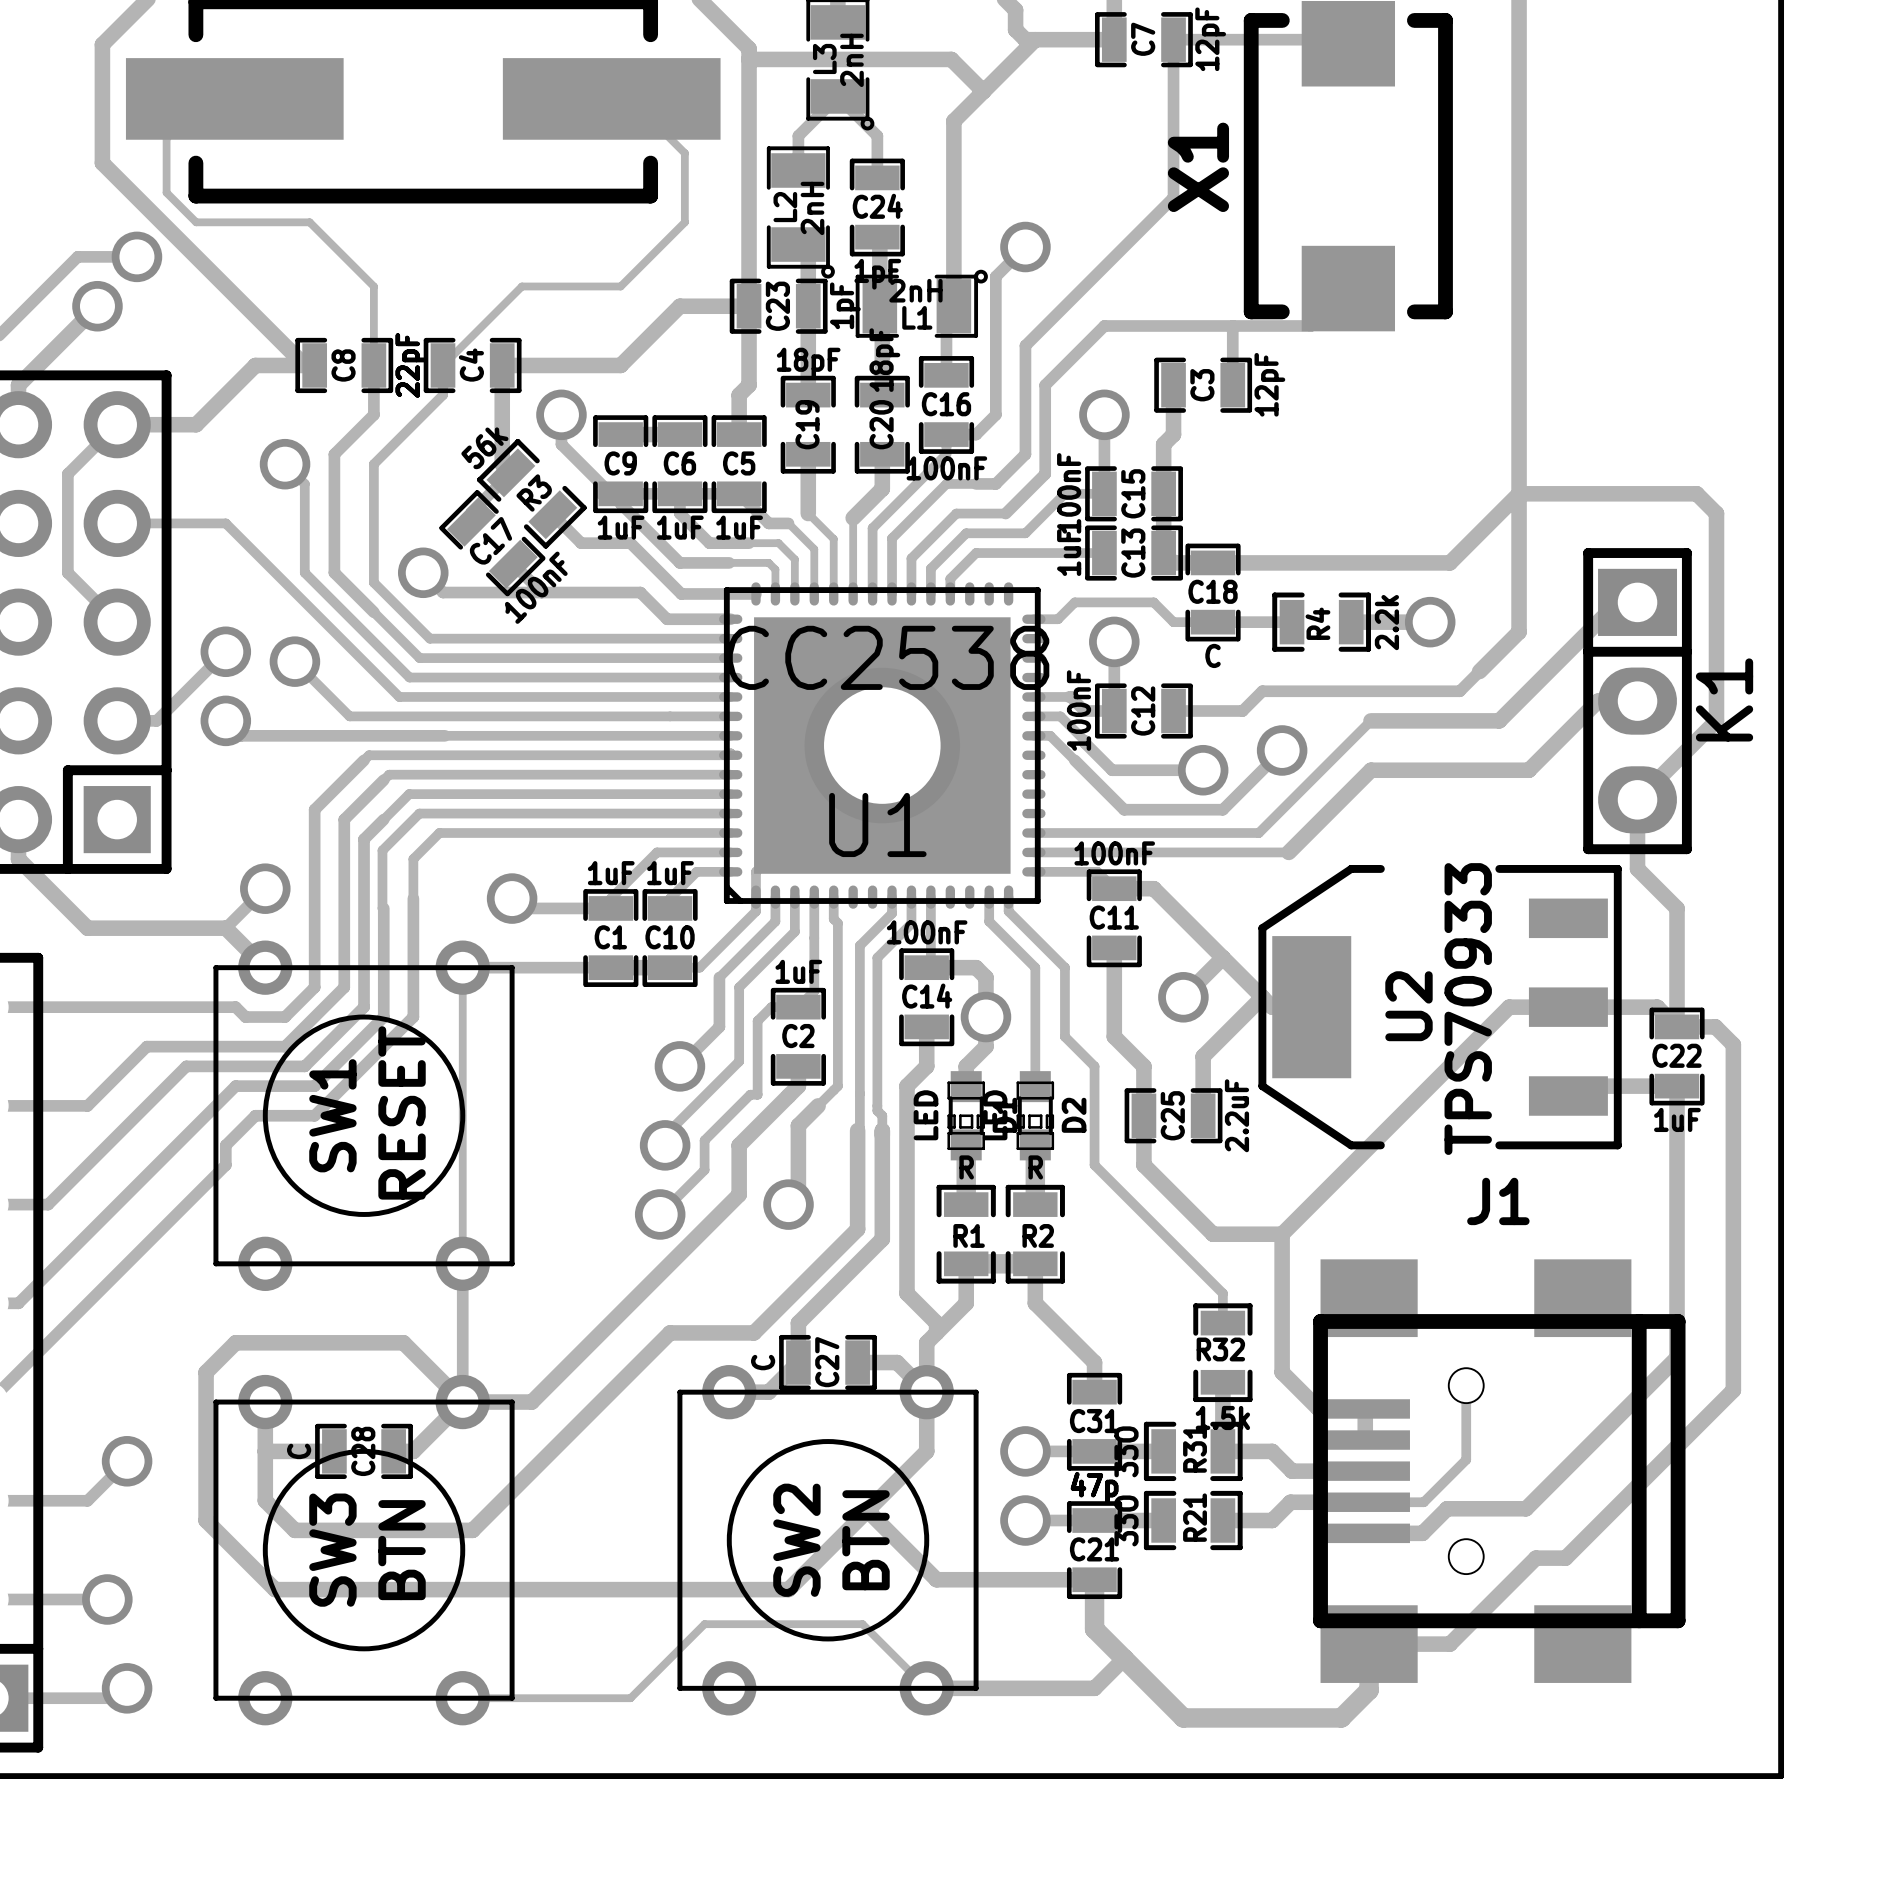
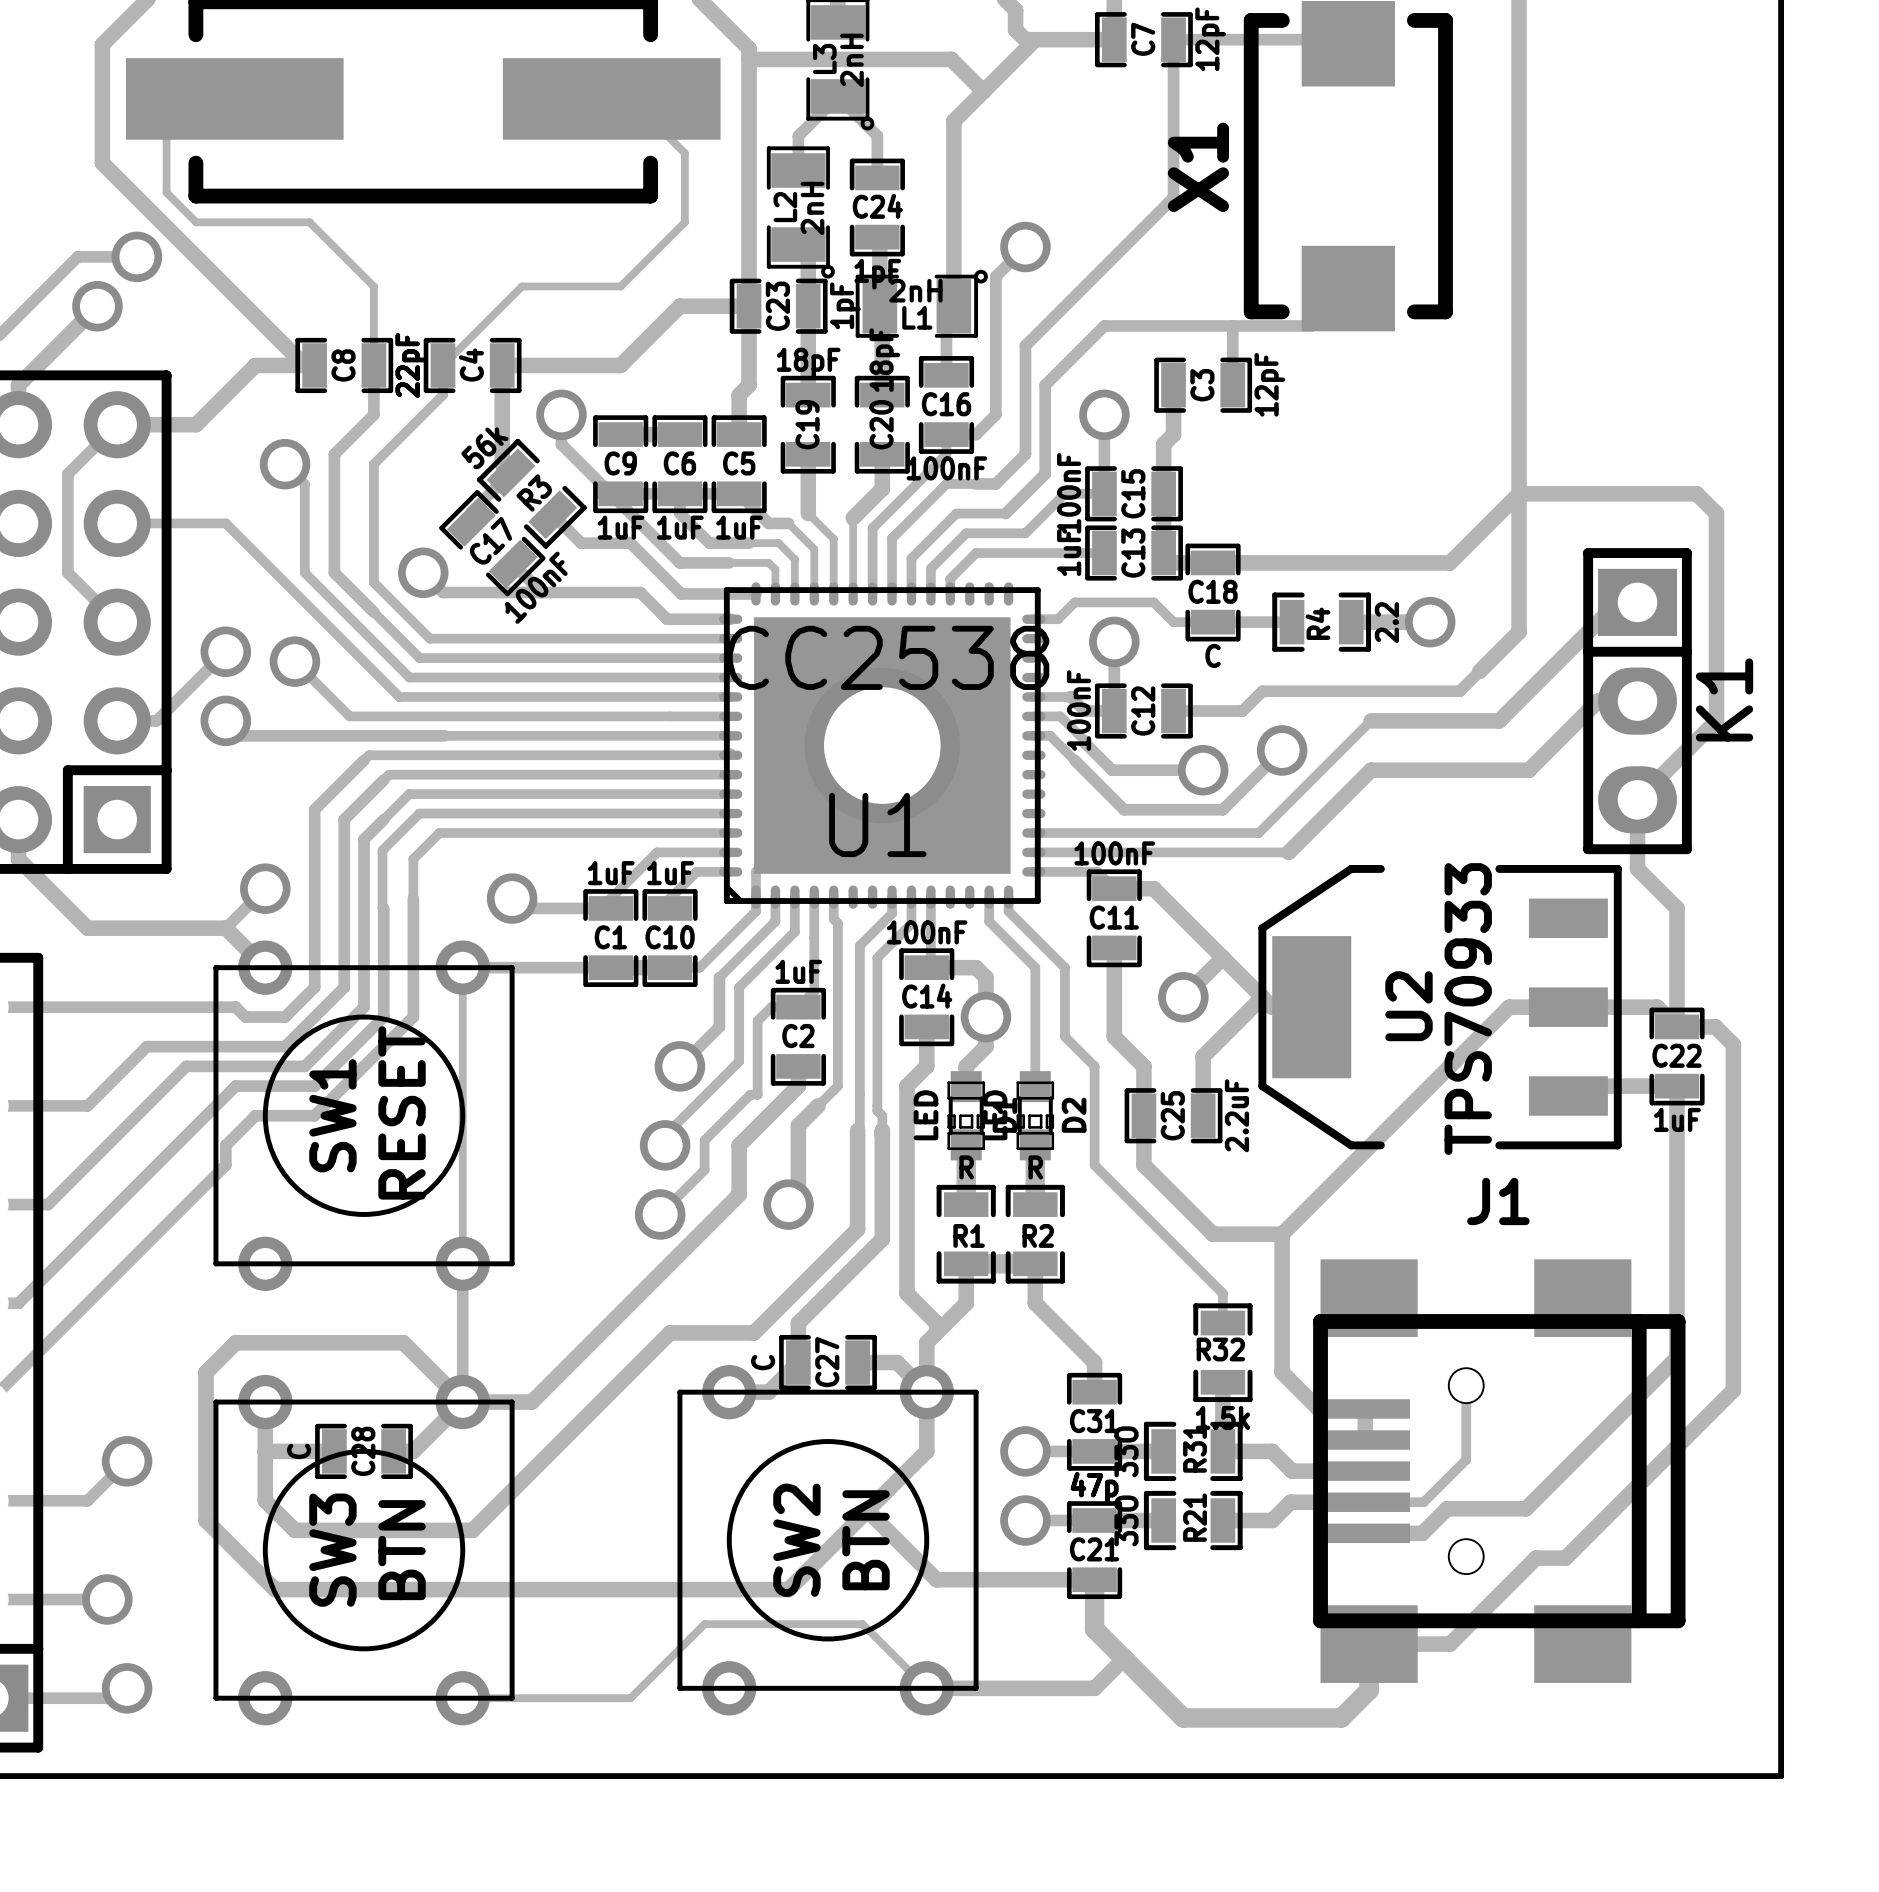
R4 value: 2.2k (1386, 622) -> 2.2 (1386, 622)

